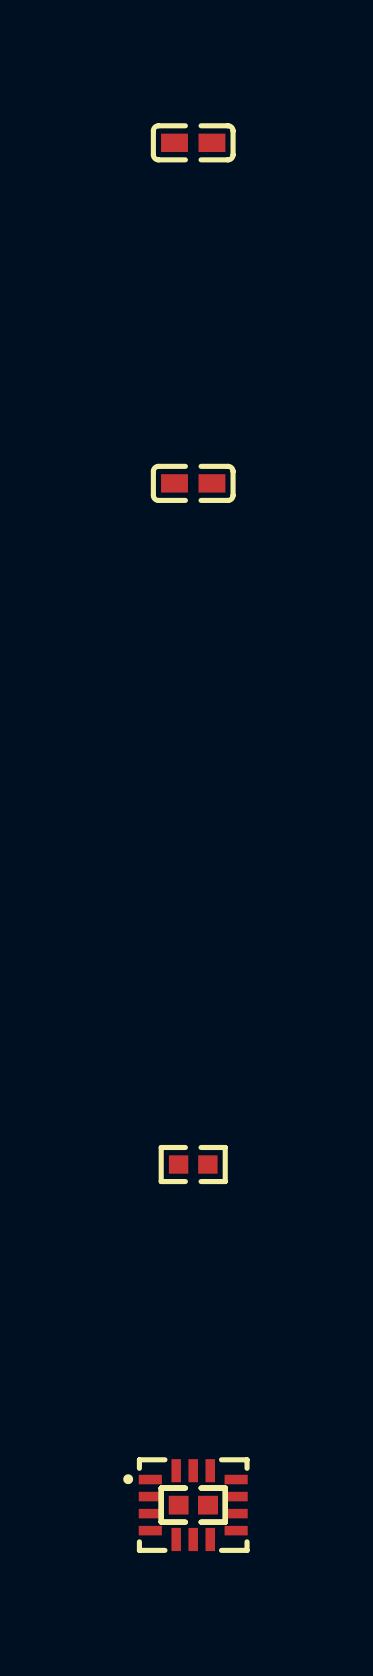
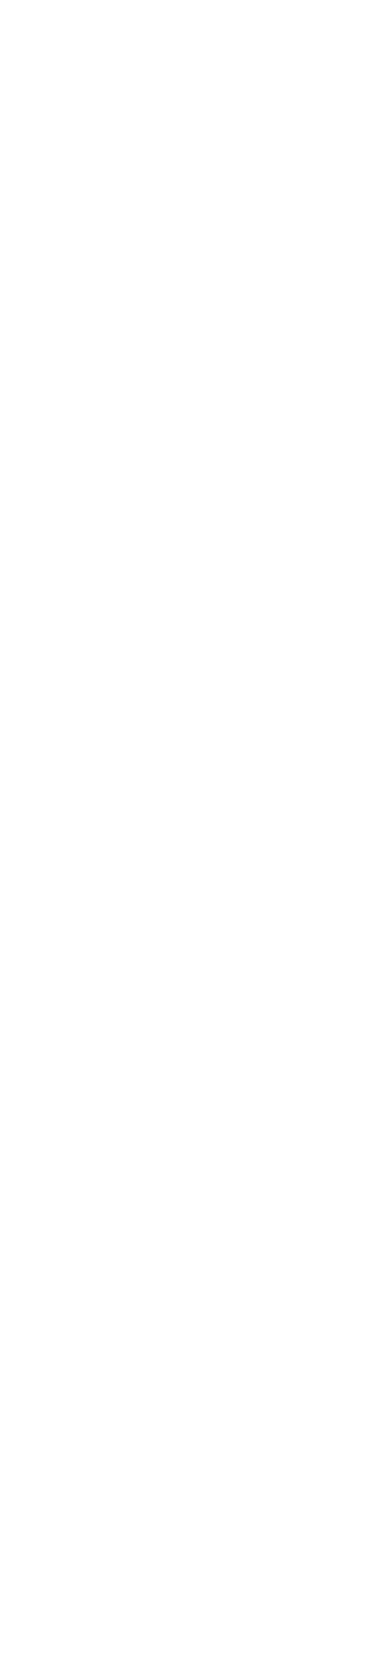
part: (193, 142) -> none
part: (193, 483) -> none
part: (193, 1164) -> none
part: (186, 1505) -> none
part: (193, 1505) -> none

